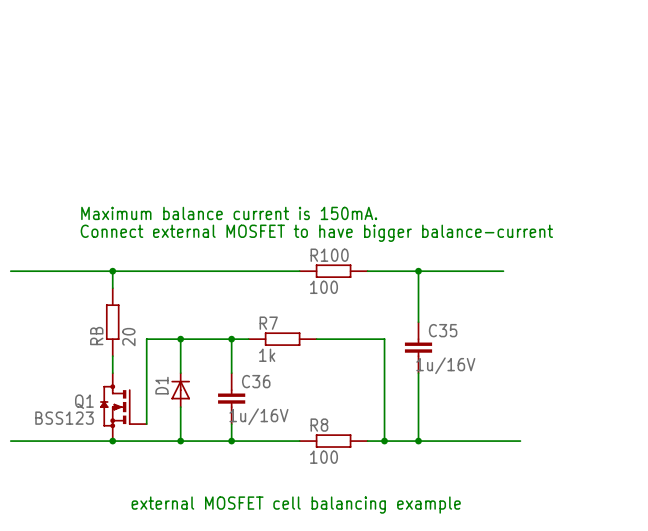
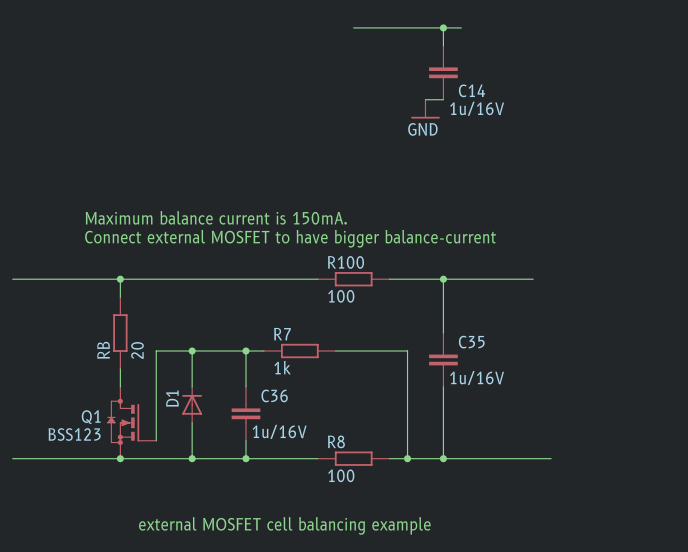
wire: none -> (353, 27) (461, 27)
wire: none -> (443, 27) (443, 45)
junction: none -> (443, 27)
C14: none -> 1u/16V (443, 72)
wire: none -> (425, 99) (443, 99)
power symbol: none -> GND (425, 109)

